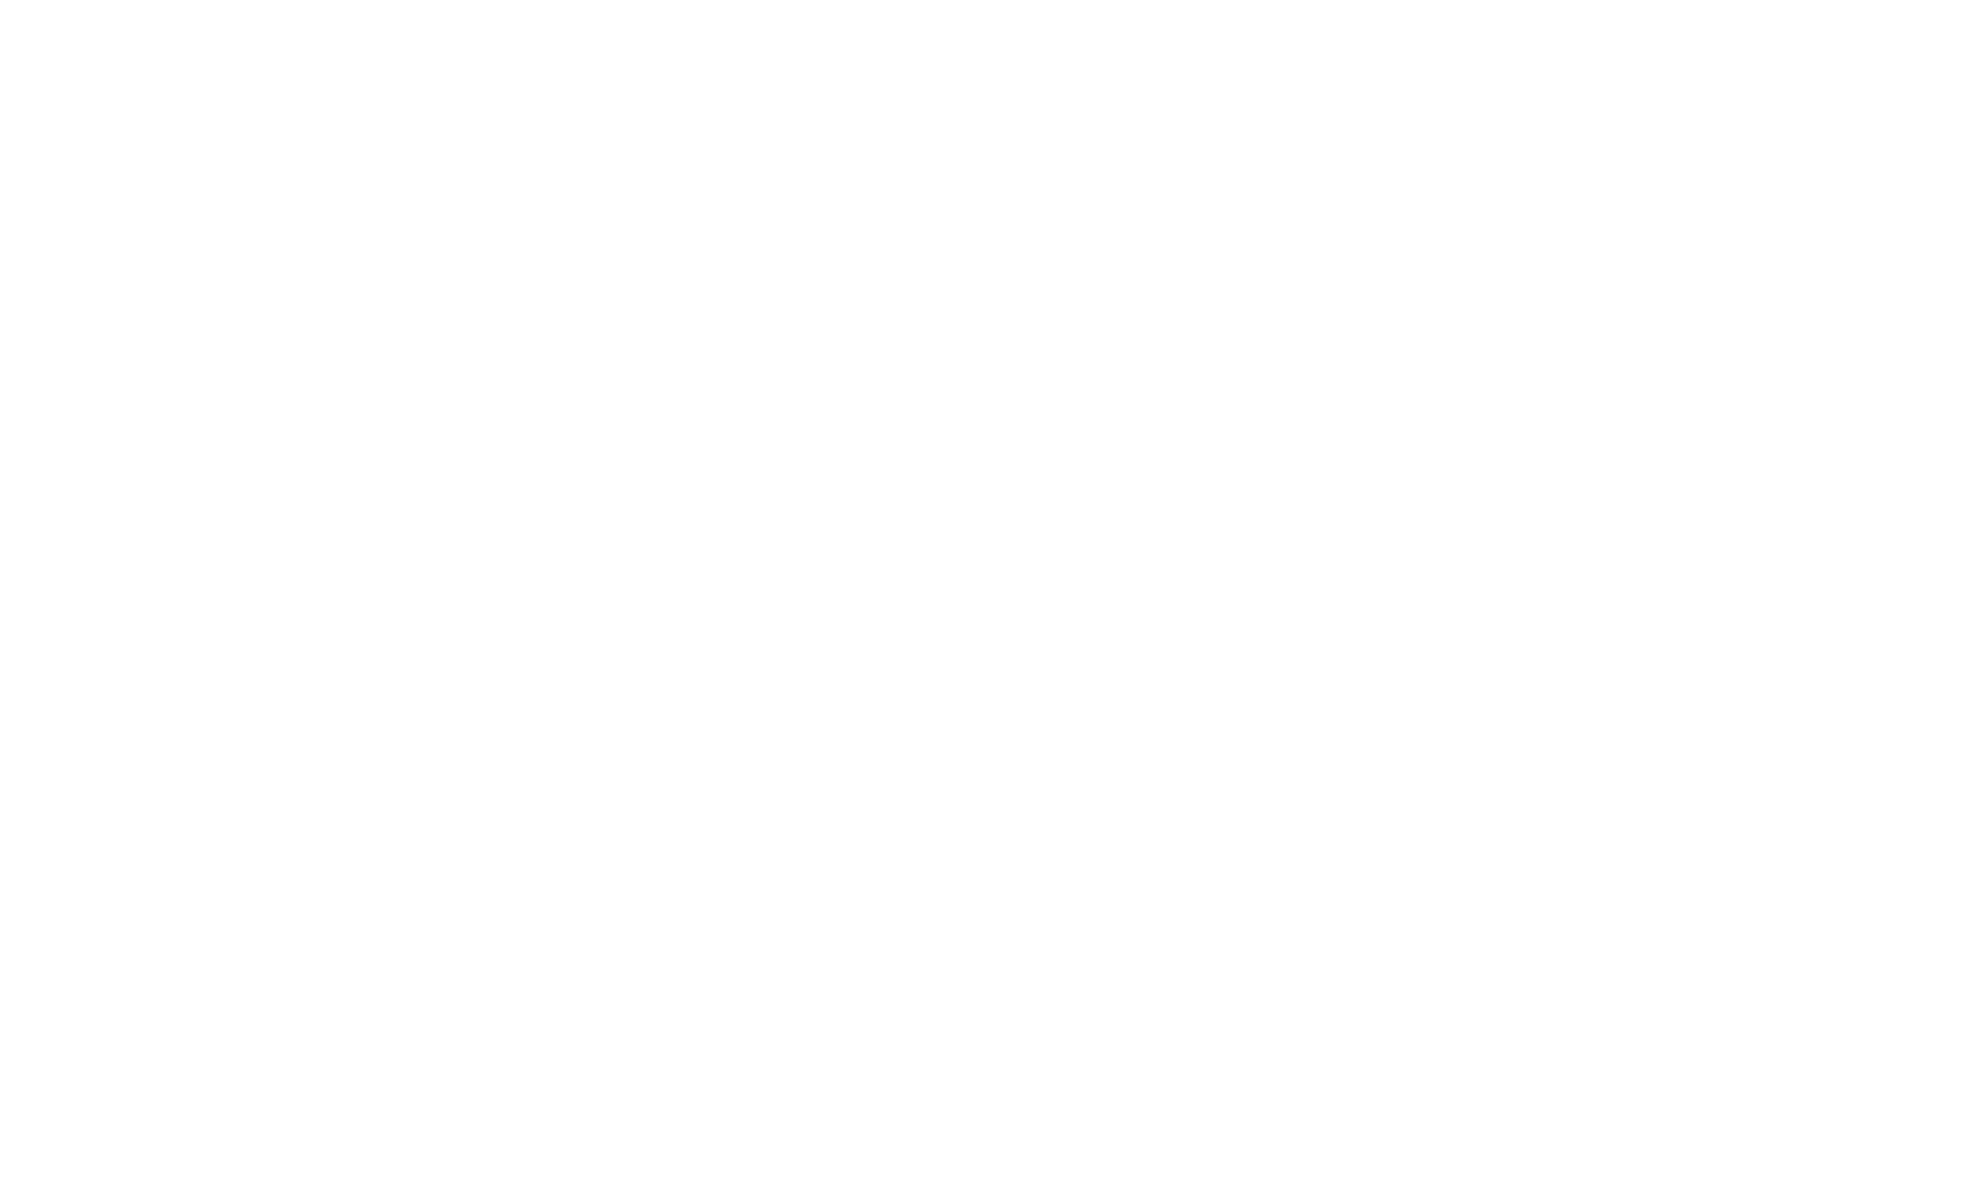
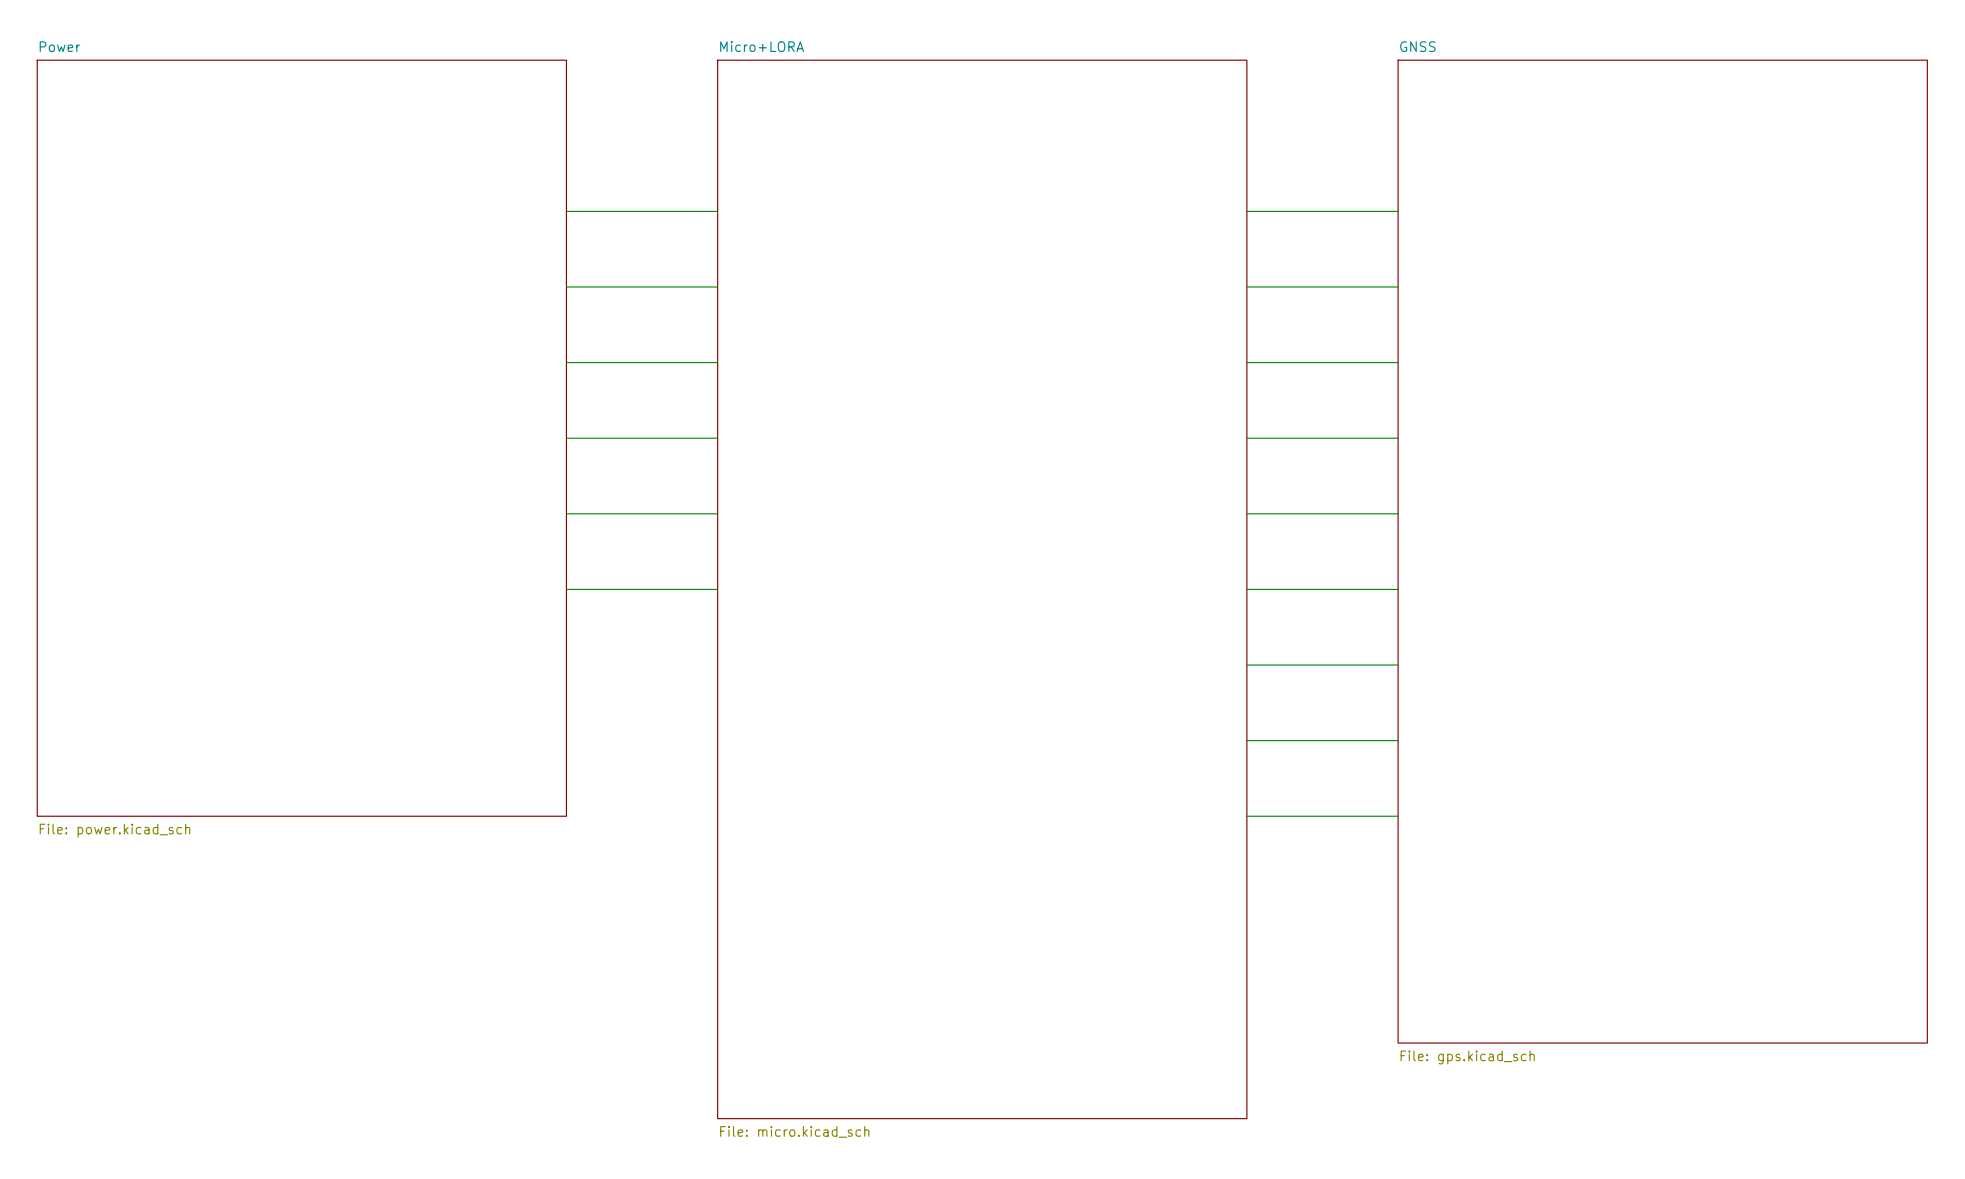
wire: none -> (566, 211) (717, 211)
wire: none -> (1246, 211) (1398, 211)
wire: none -> (566, 287) (717, 287)
wire: none -> (1246, 287) (1398, 287)
wire: none -> (566, 362) (717, 362)
wire: none -> (1246, 362) (1398, 362)
sheet Power: none -> File: power.kicad_sch (301, 438)
wire: none -> (566, 438) (717, 438)
wire: none -> (1246, 438) (1398, 438)
wire: none -> (566, 513) (717, 513)
wire: none -> (1246, 513) (1398, 513)
sheet GNSS: none -> File: gps.kicad_sch (1662, 551)
wire: none -> (566, 589) (717, 589)
sheet Micro+LORA: none -> File: micro.kicad_sch (982, 589)
wire: none -> (1246, 589) (1398, 589)
wire: none -> (1246, 665) (1398, 665)
wire: none -> (1246, 740) (1398, 740)
wire: none -> (1246, 816) (1398, 816)

